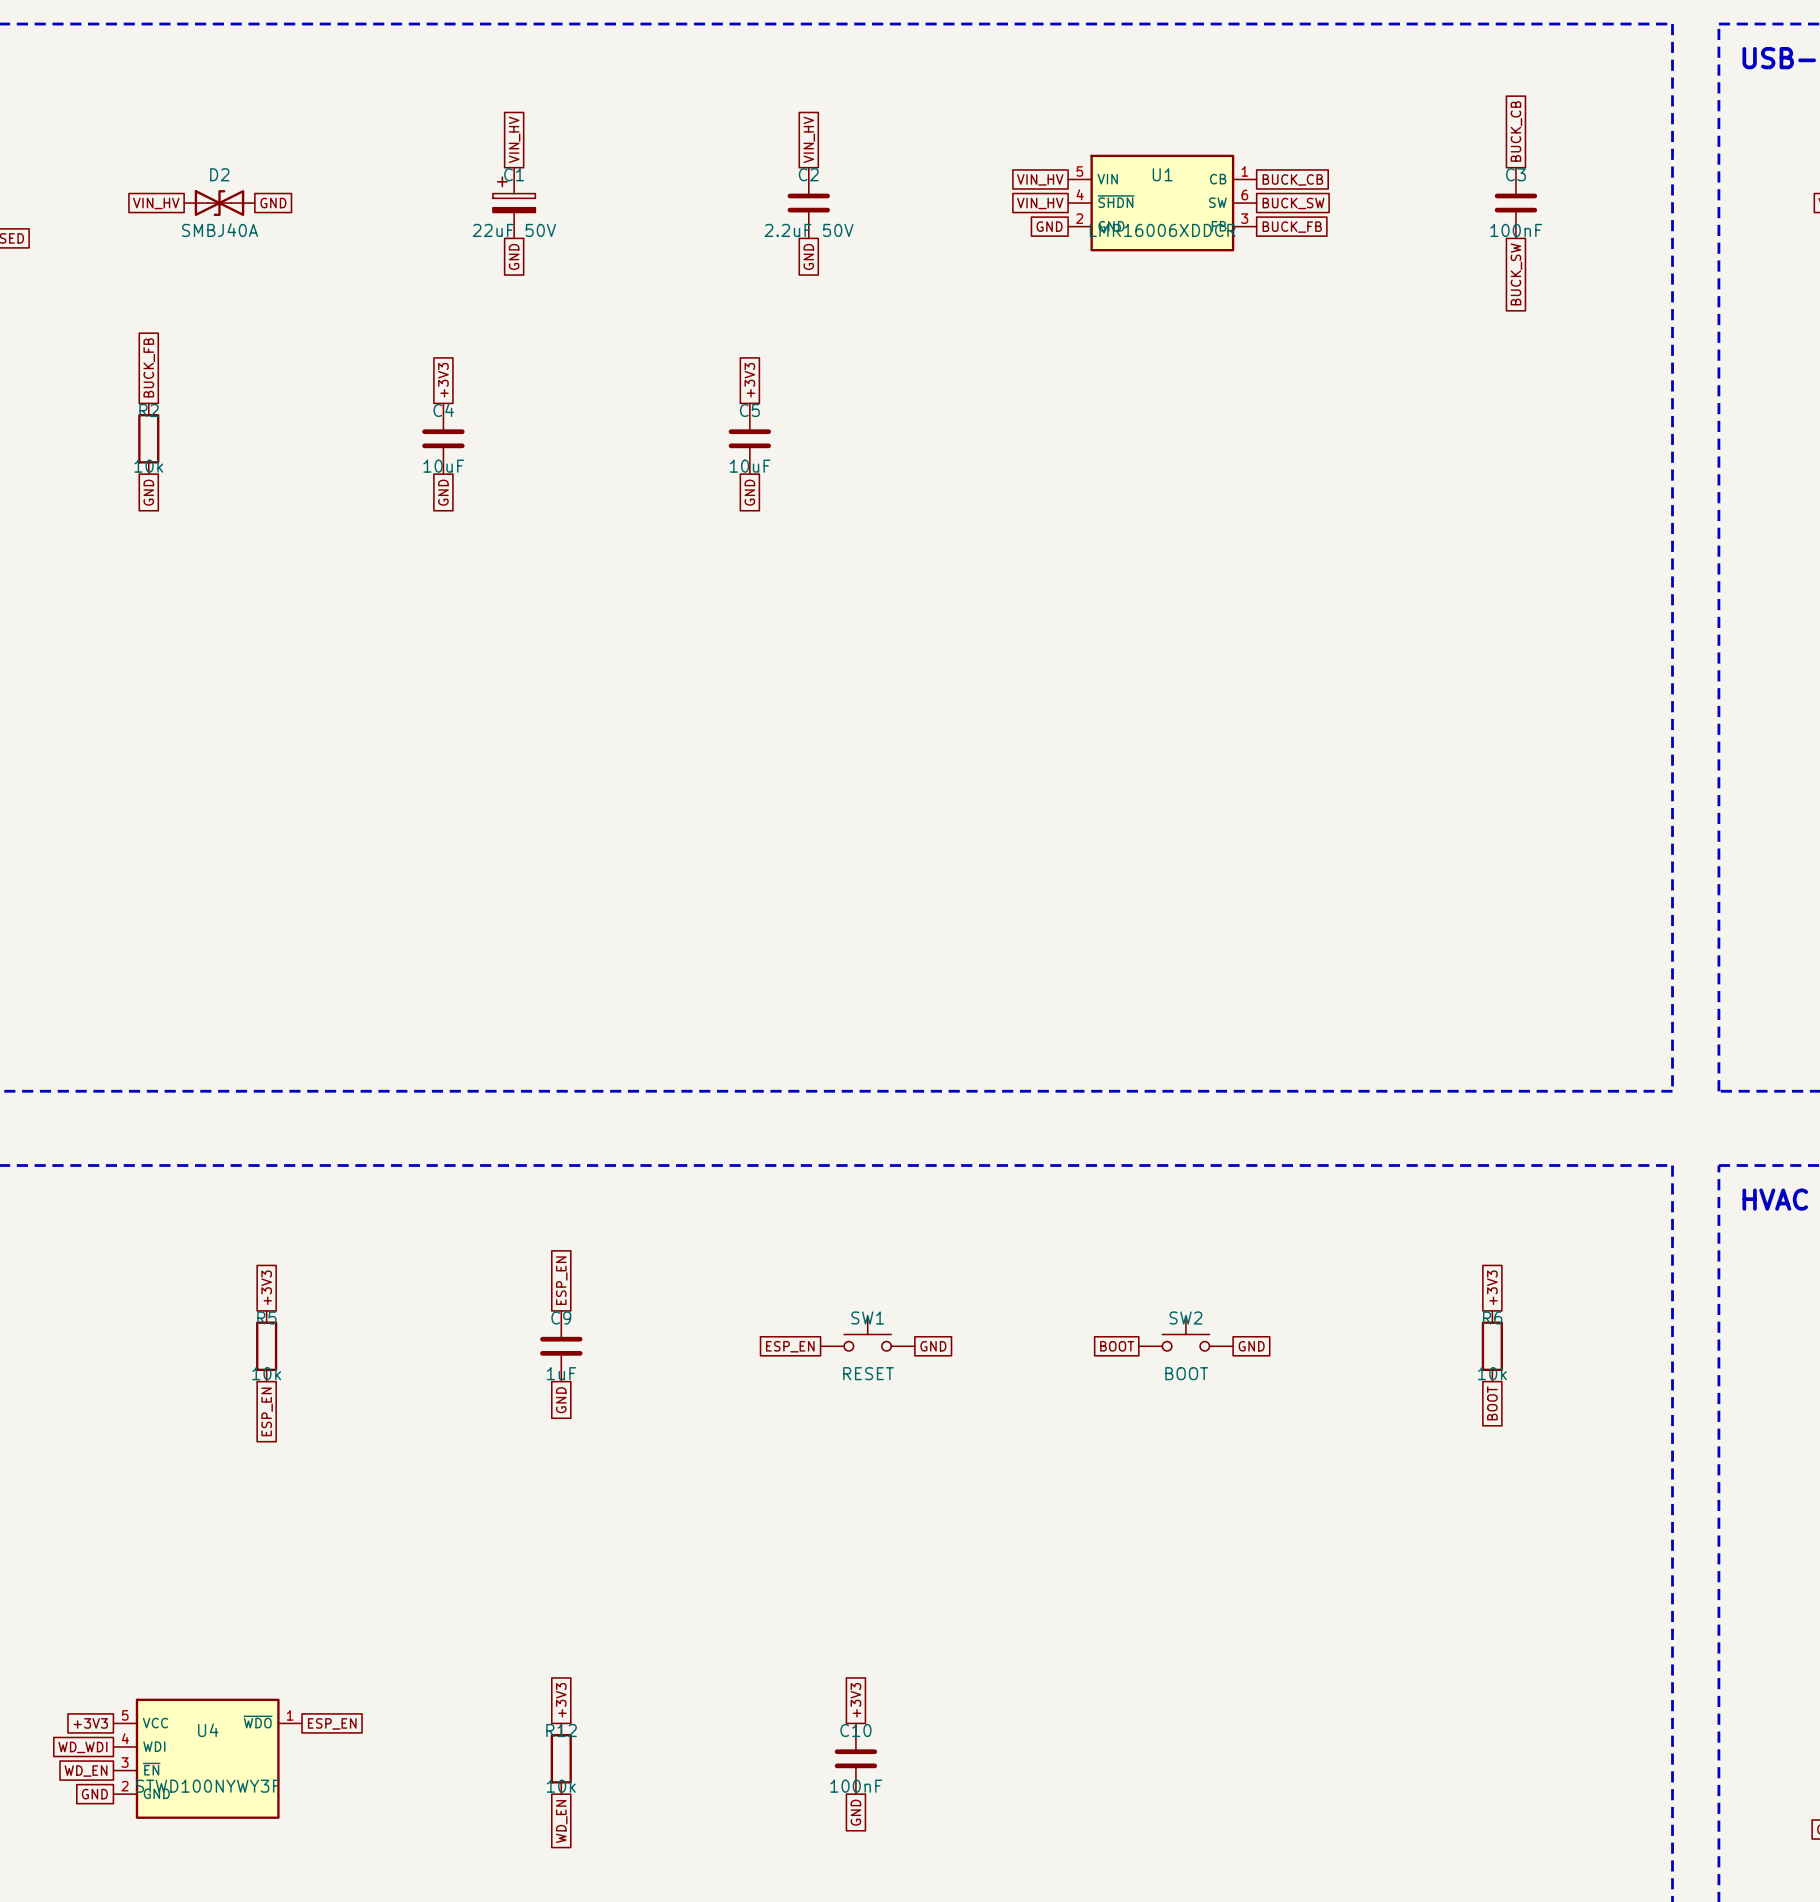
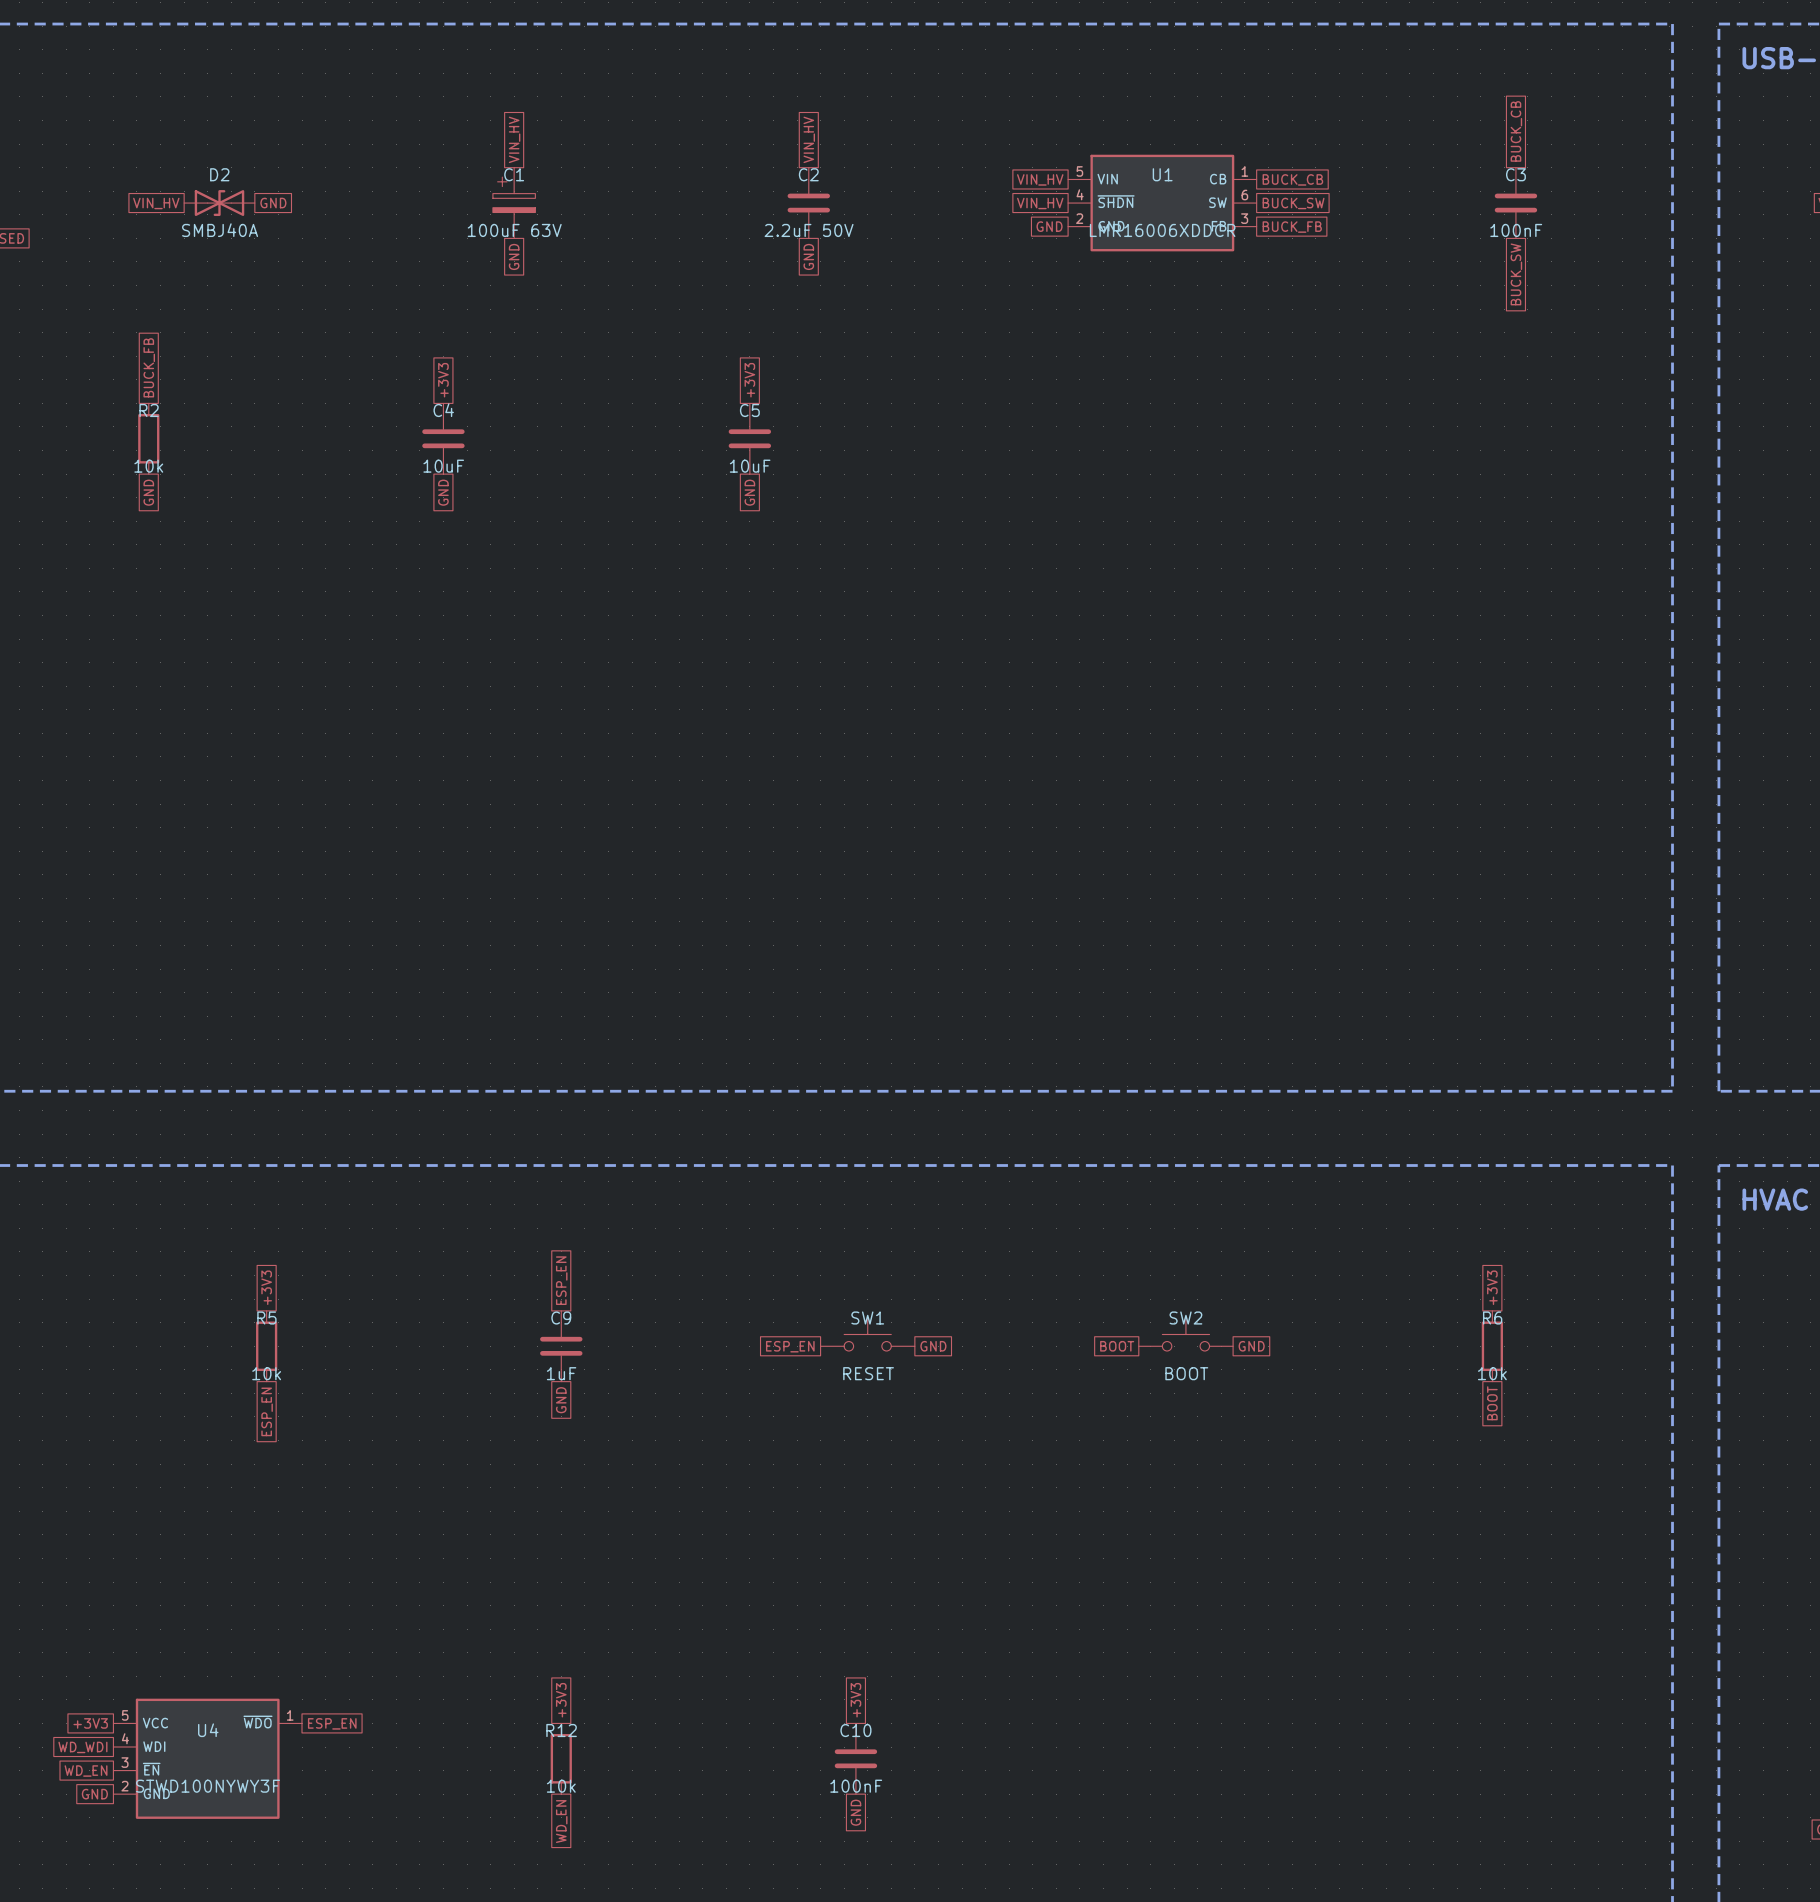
C1 value: 22uF 50V (514, 230) -> 100uF 63V (514, 230)

